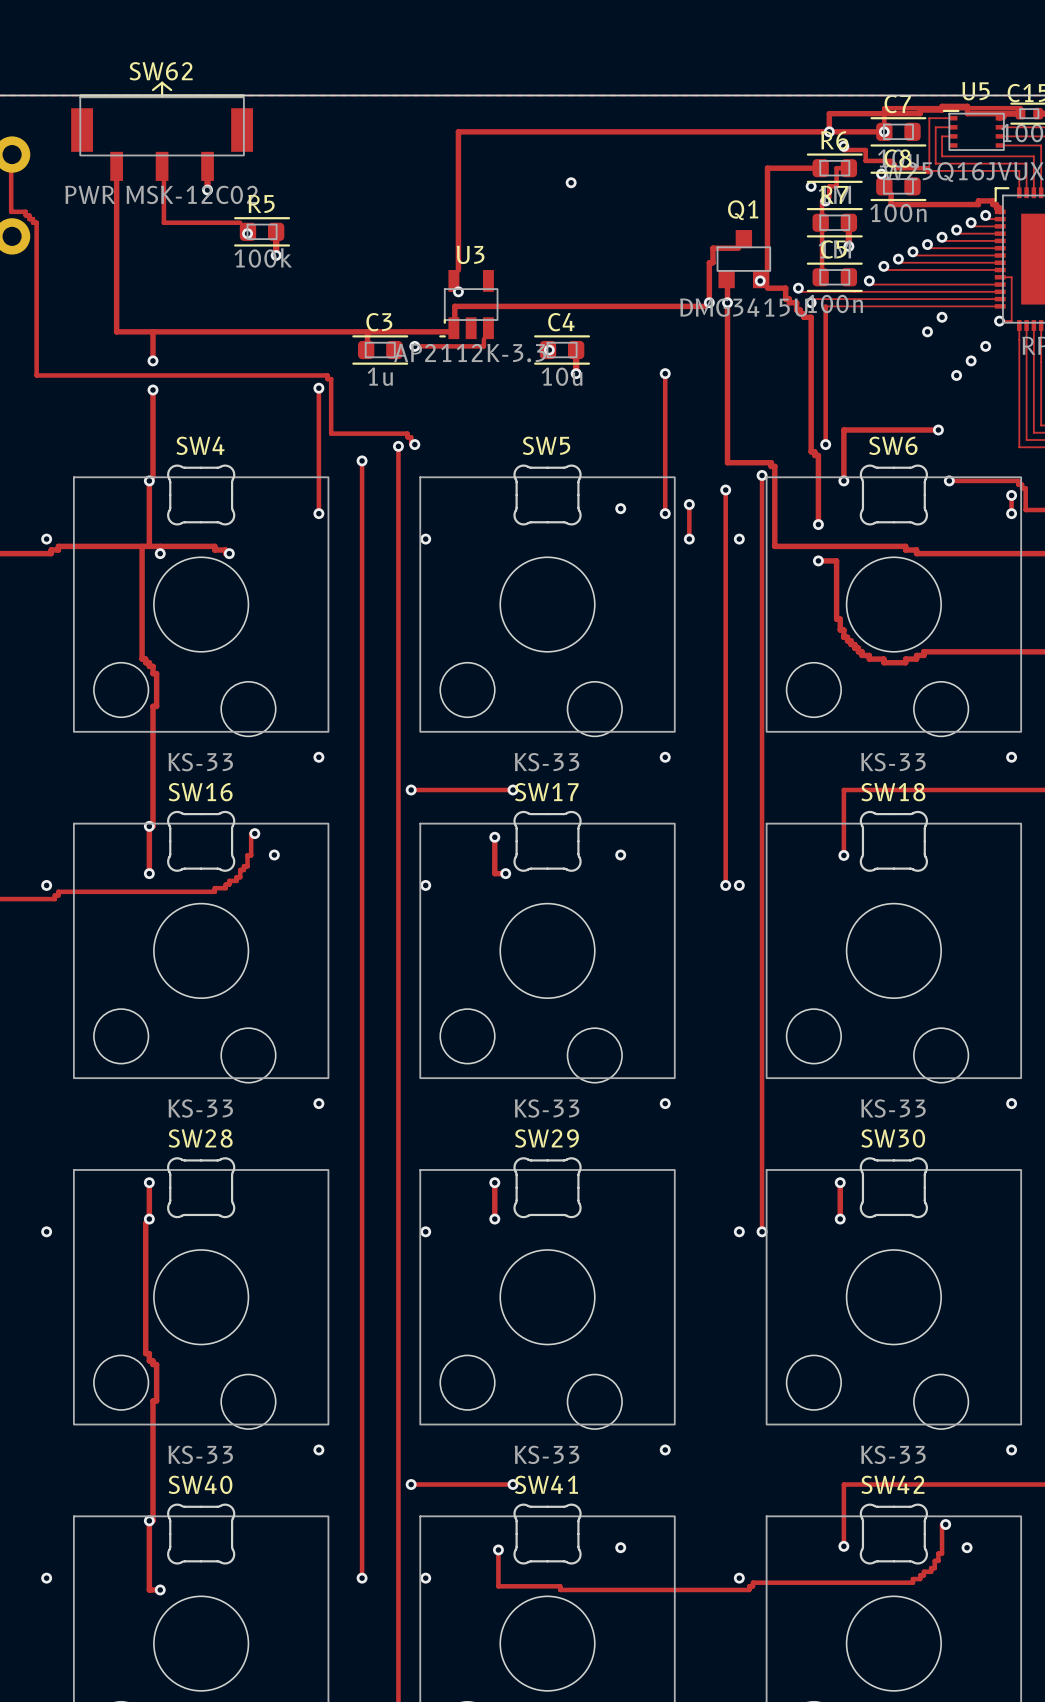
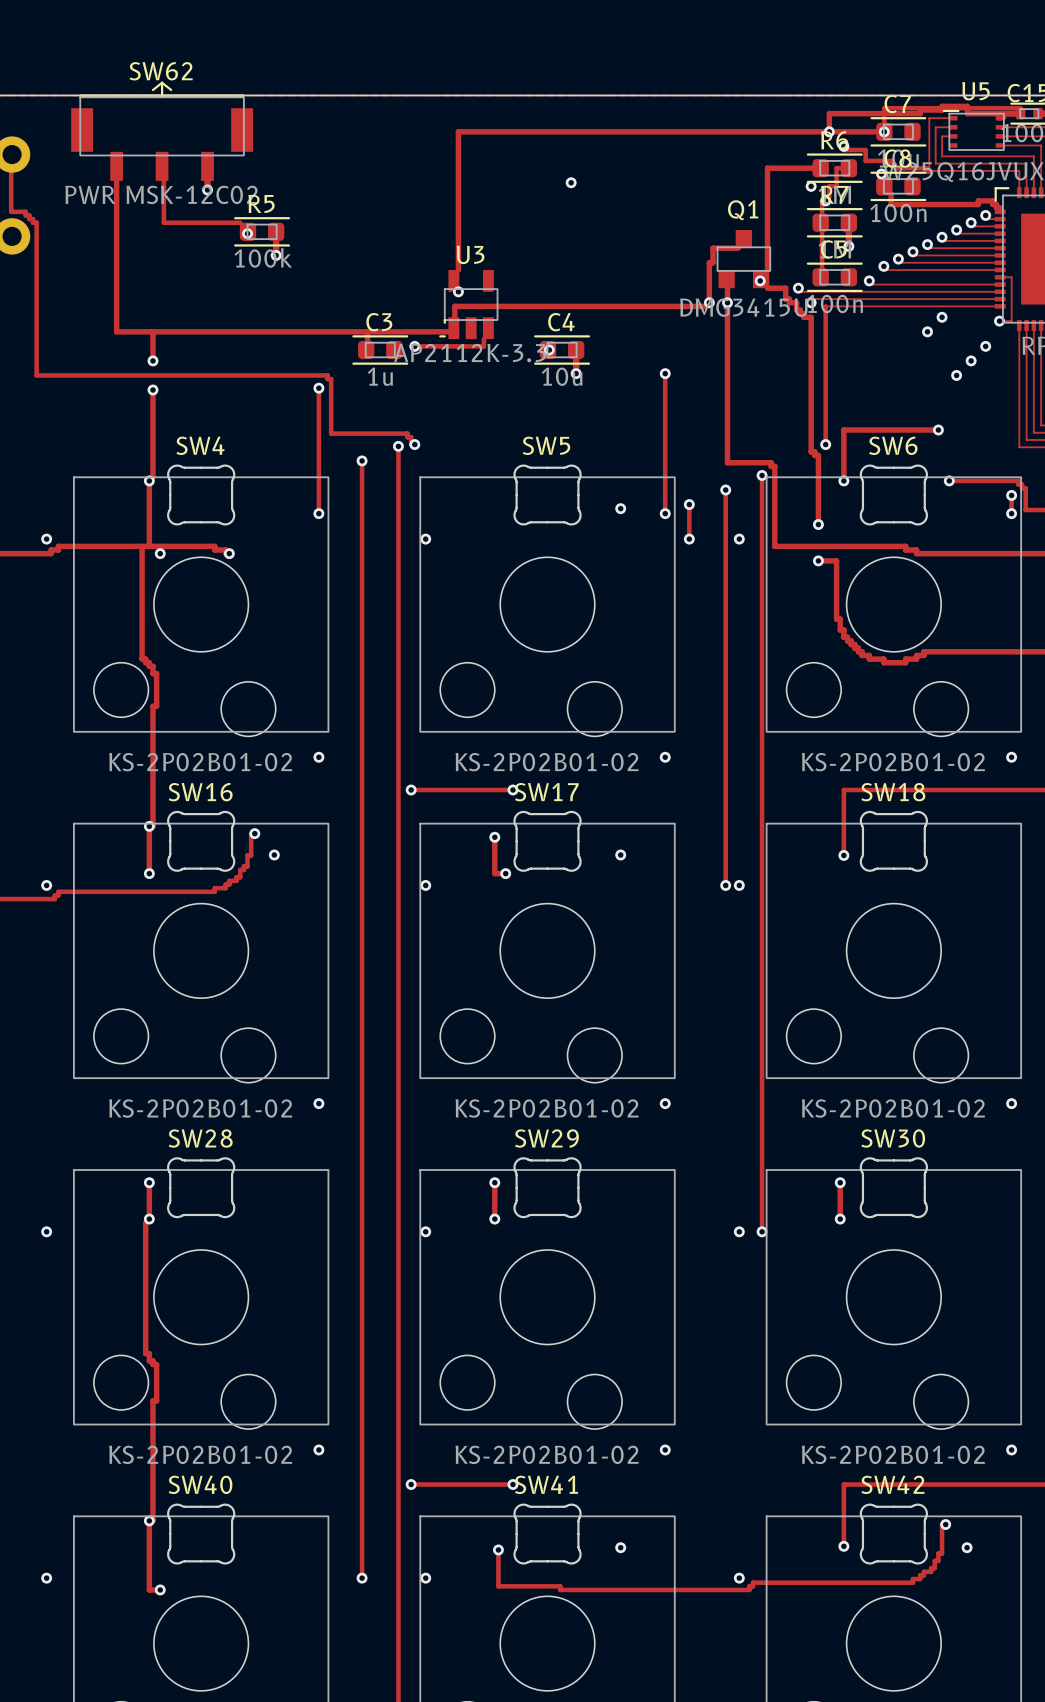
SW4 value: KS-33 (200, 762) -> KS-2P02B01-02 (200, 762)
SW5 value: KS-33 (547, 762) -> KS-2P02B01-02 (547, 762)
SW6 value: KS-33 (893, 762) -> KS-2P02B01-02 (893, 762)
SW16 value: KS-33 (200, 1108) -> KS-2P02B01-02 (200, 1108)
SW17 value: KS-33 (547, 1108) -> KS-2P02B01-02 (547, 1108)
SW18 value: KS-33 (893, 1108) -> KS-2P02B01-02 (893, 1108)
SW28 value: KS-33 (200, 1454) -> KS-2P02B01-02 (200, 1454)
SW29 value: KS-33 (547, 1454) -> KS-2P02B01-02 (547, 1454)
SW30 value: KS-33 (893, 1454) -> KS-2P02B01-02 (893, 1454)

